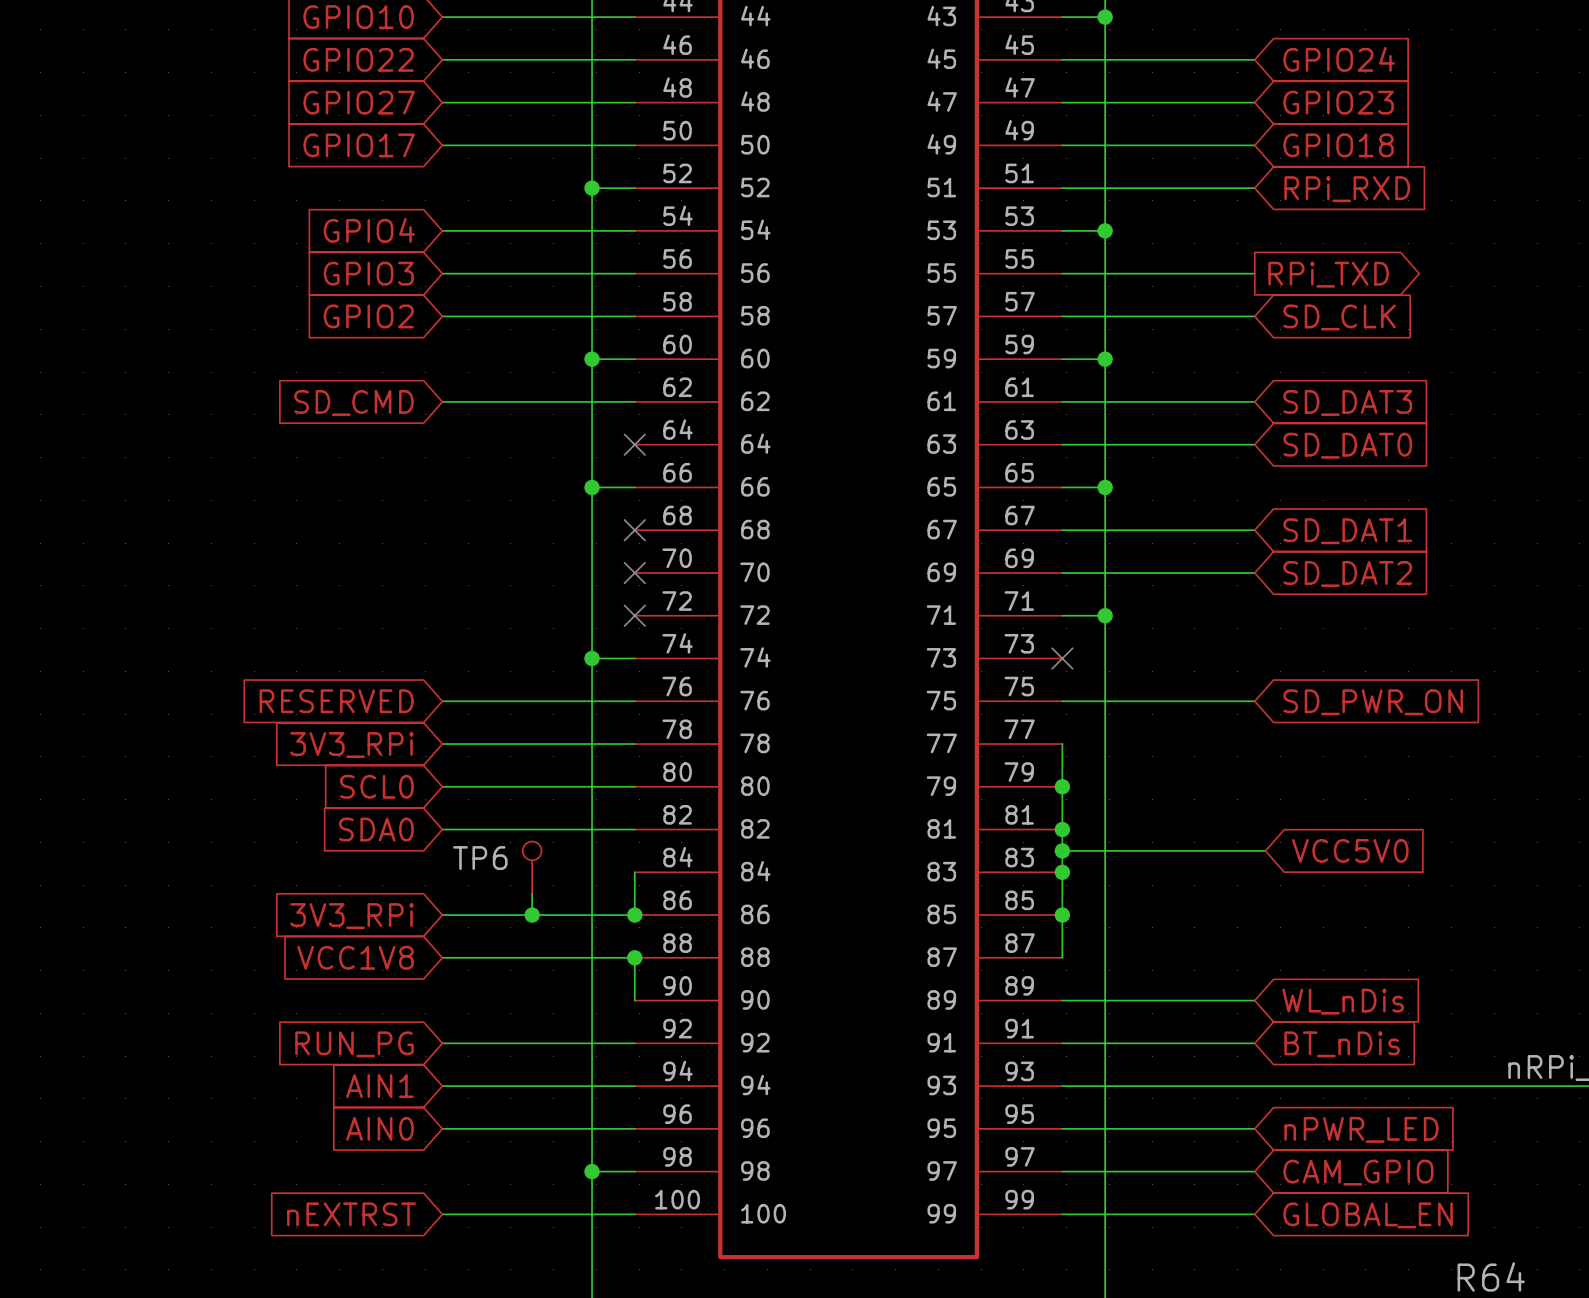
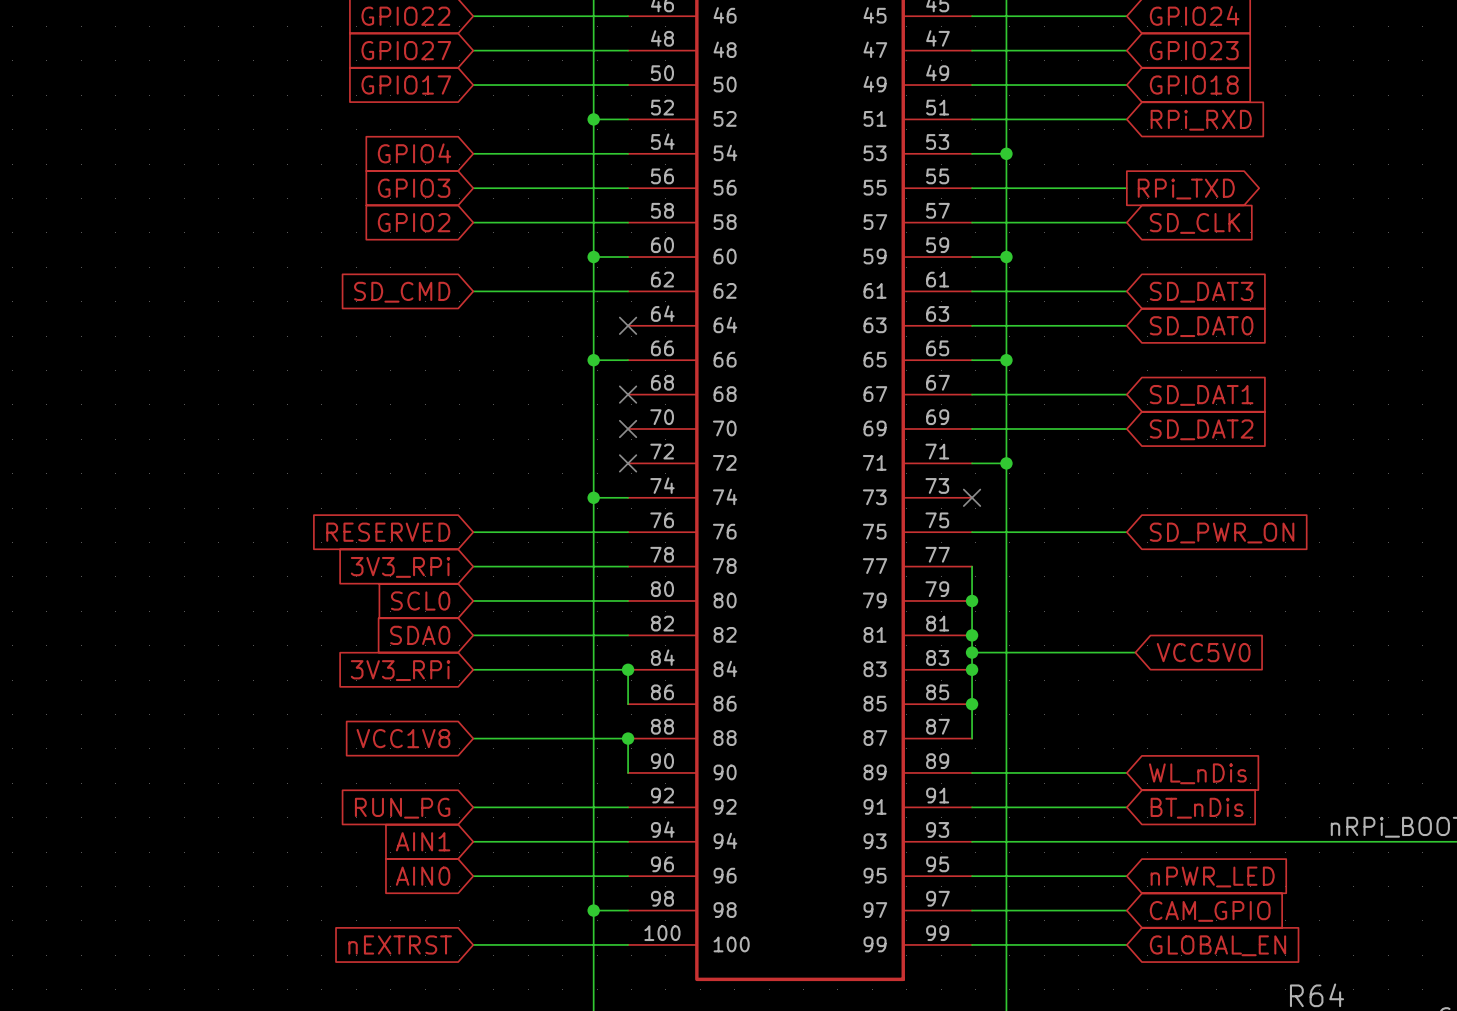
TP6: (532, 867) -> none
wire: (532, 893) (532, 915) -> none
wire: (442, 915) (634, 915) -> (473, 669) (628, 669)
junction: (532, 915) -> none
junction position: (634, 915) -> (628, 669)
global label position: 3V3_RPi (351, 916) -> 3V3_RPi (400, 670)

